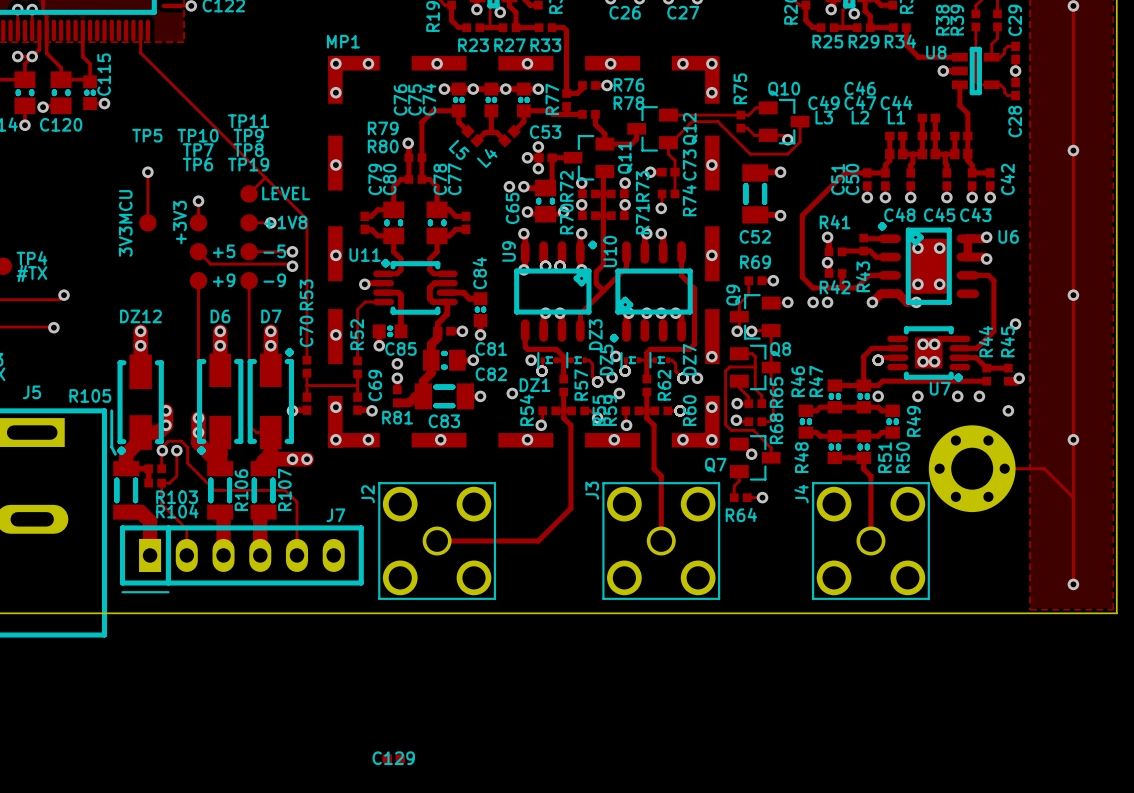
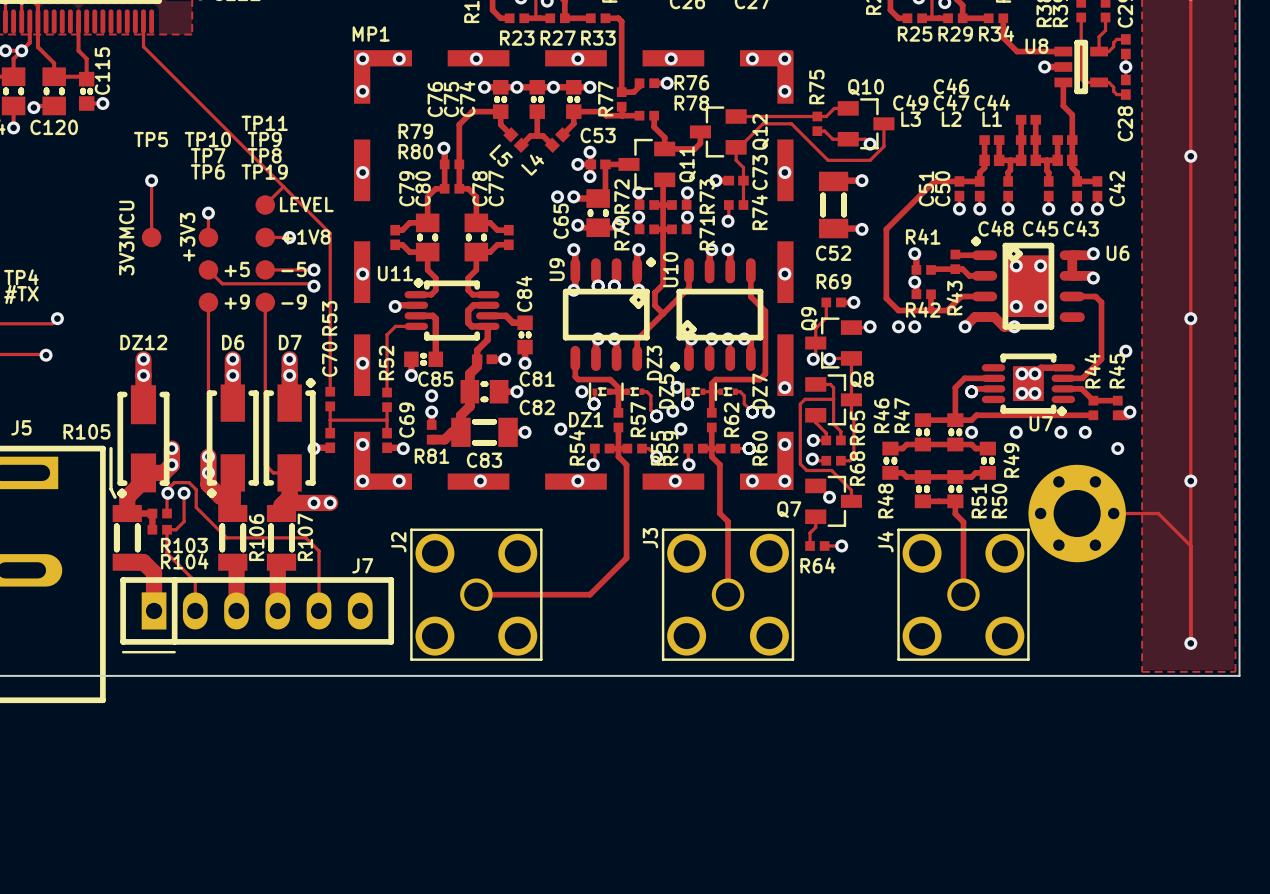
C129: (393, 758) -> none

